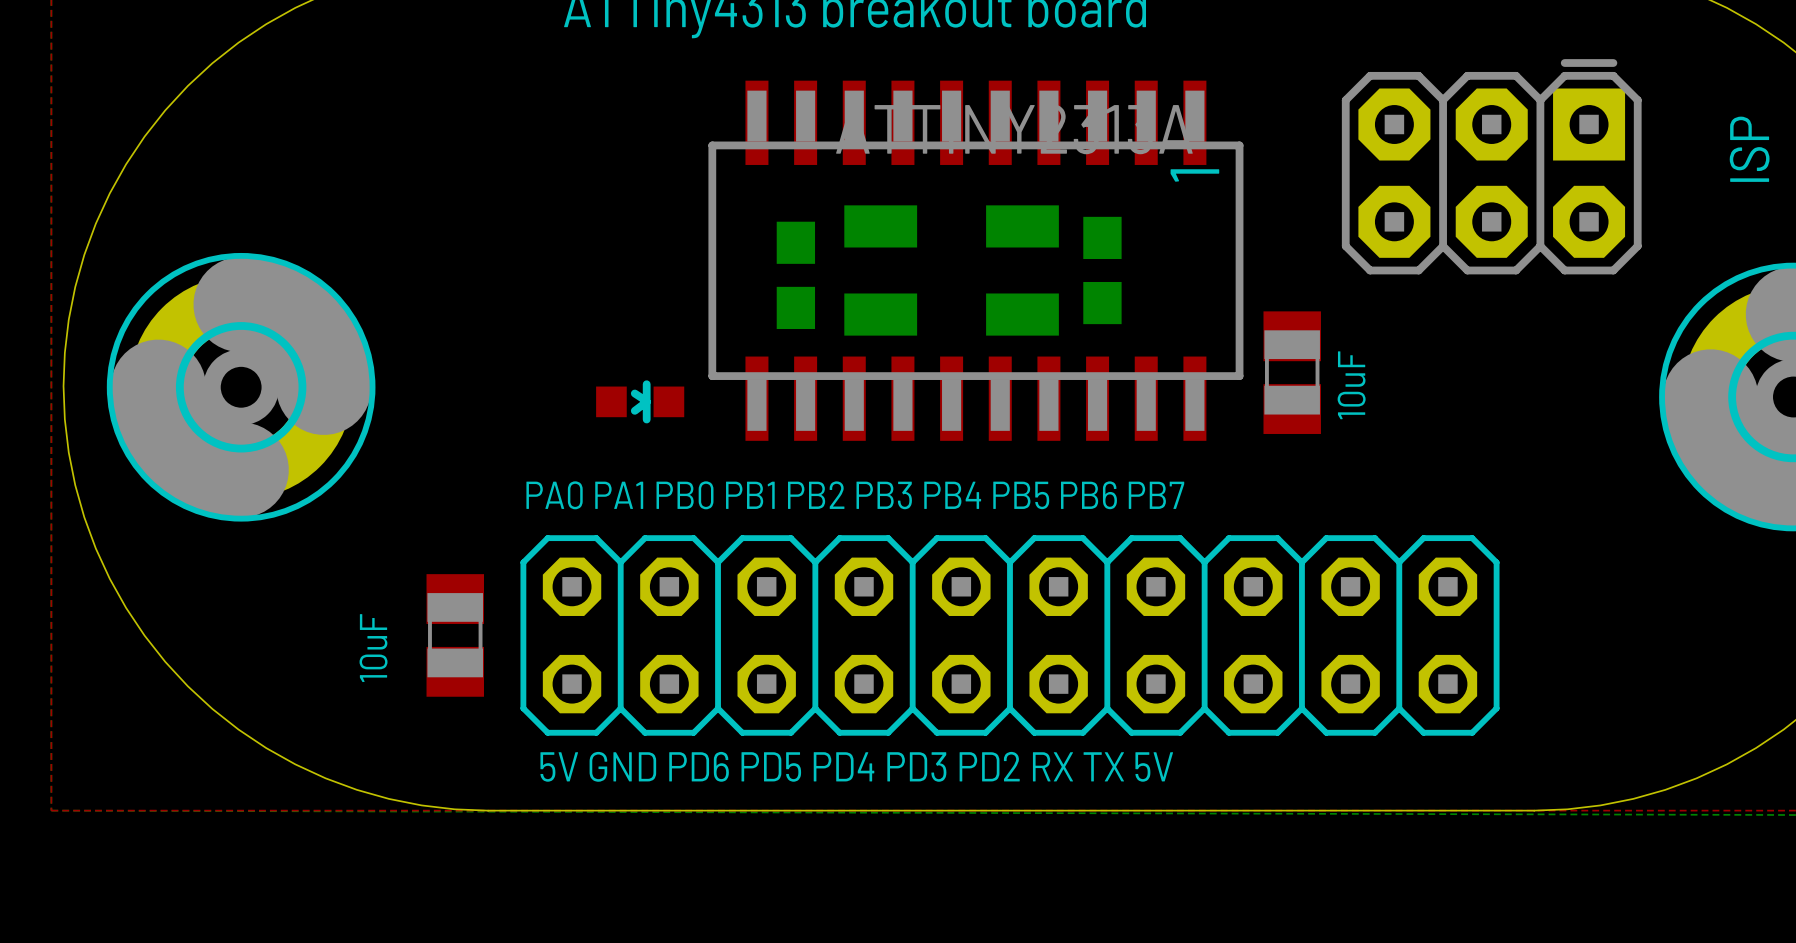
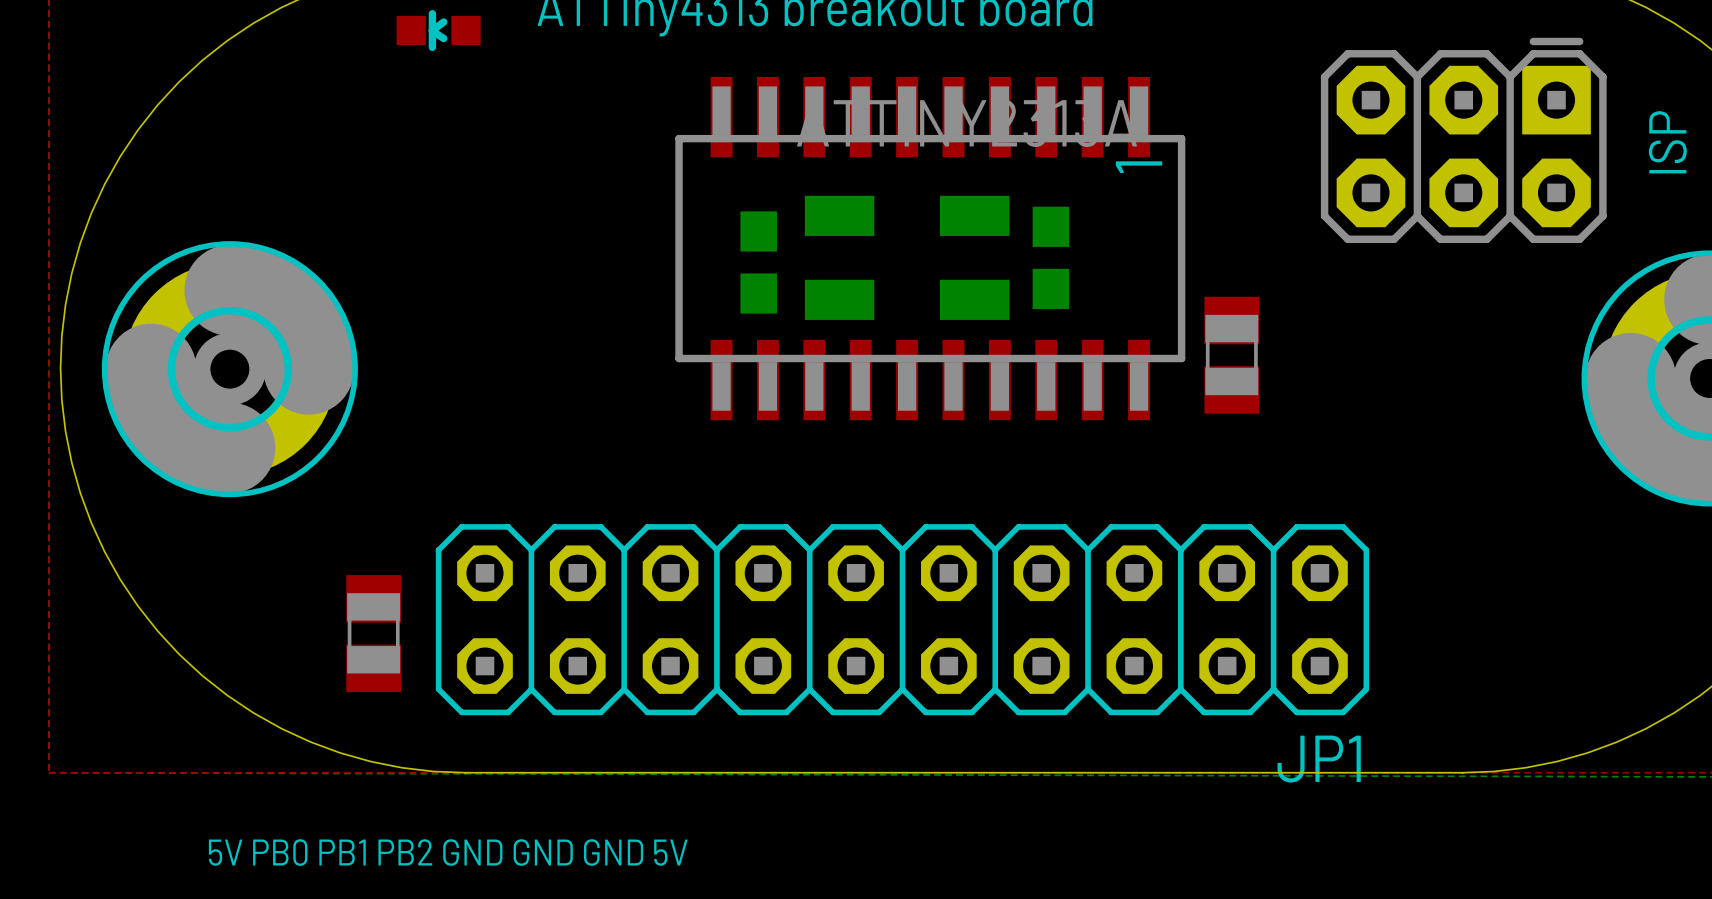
part position: (1491, 166) -> (1463, 140)
text: 10uF (1351, 385) -> none
part rotation: 0° (640, 401) -> 180° (438, 30)
part position: (640, 401) -> (438, 30)
text: PA0 PA1 PB0 PB1 PB2 PB3 PB4 PB5 PB6 PB7 (855, 495) -> none
part position: (455, 635) -> (373, 633)
part: (1009, 635) -> none
text: 10uF (373, 648) -> none
JP1: none -> (902, 619)
text: 5V GND PD6 PD5 PD4 PD3 PD2 RX TX 5V (856, 766) -> none
text: none -> 5V PB0 PB1 PB2 GND GND GND 5V (448, 852)

